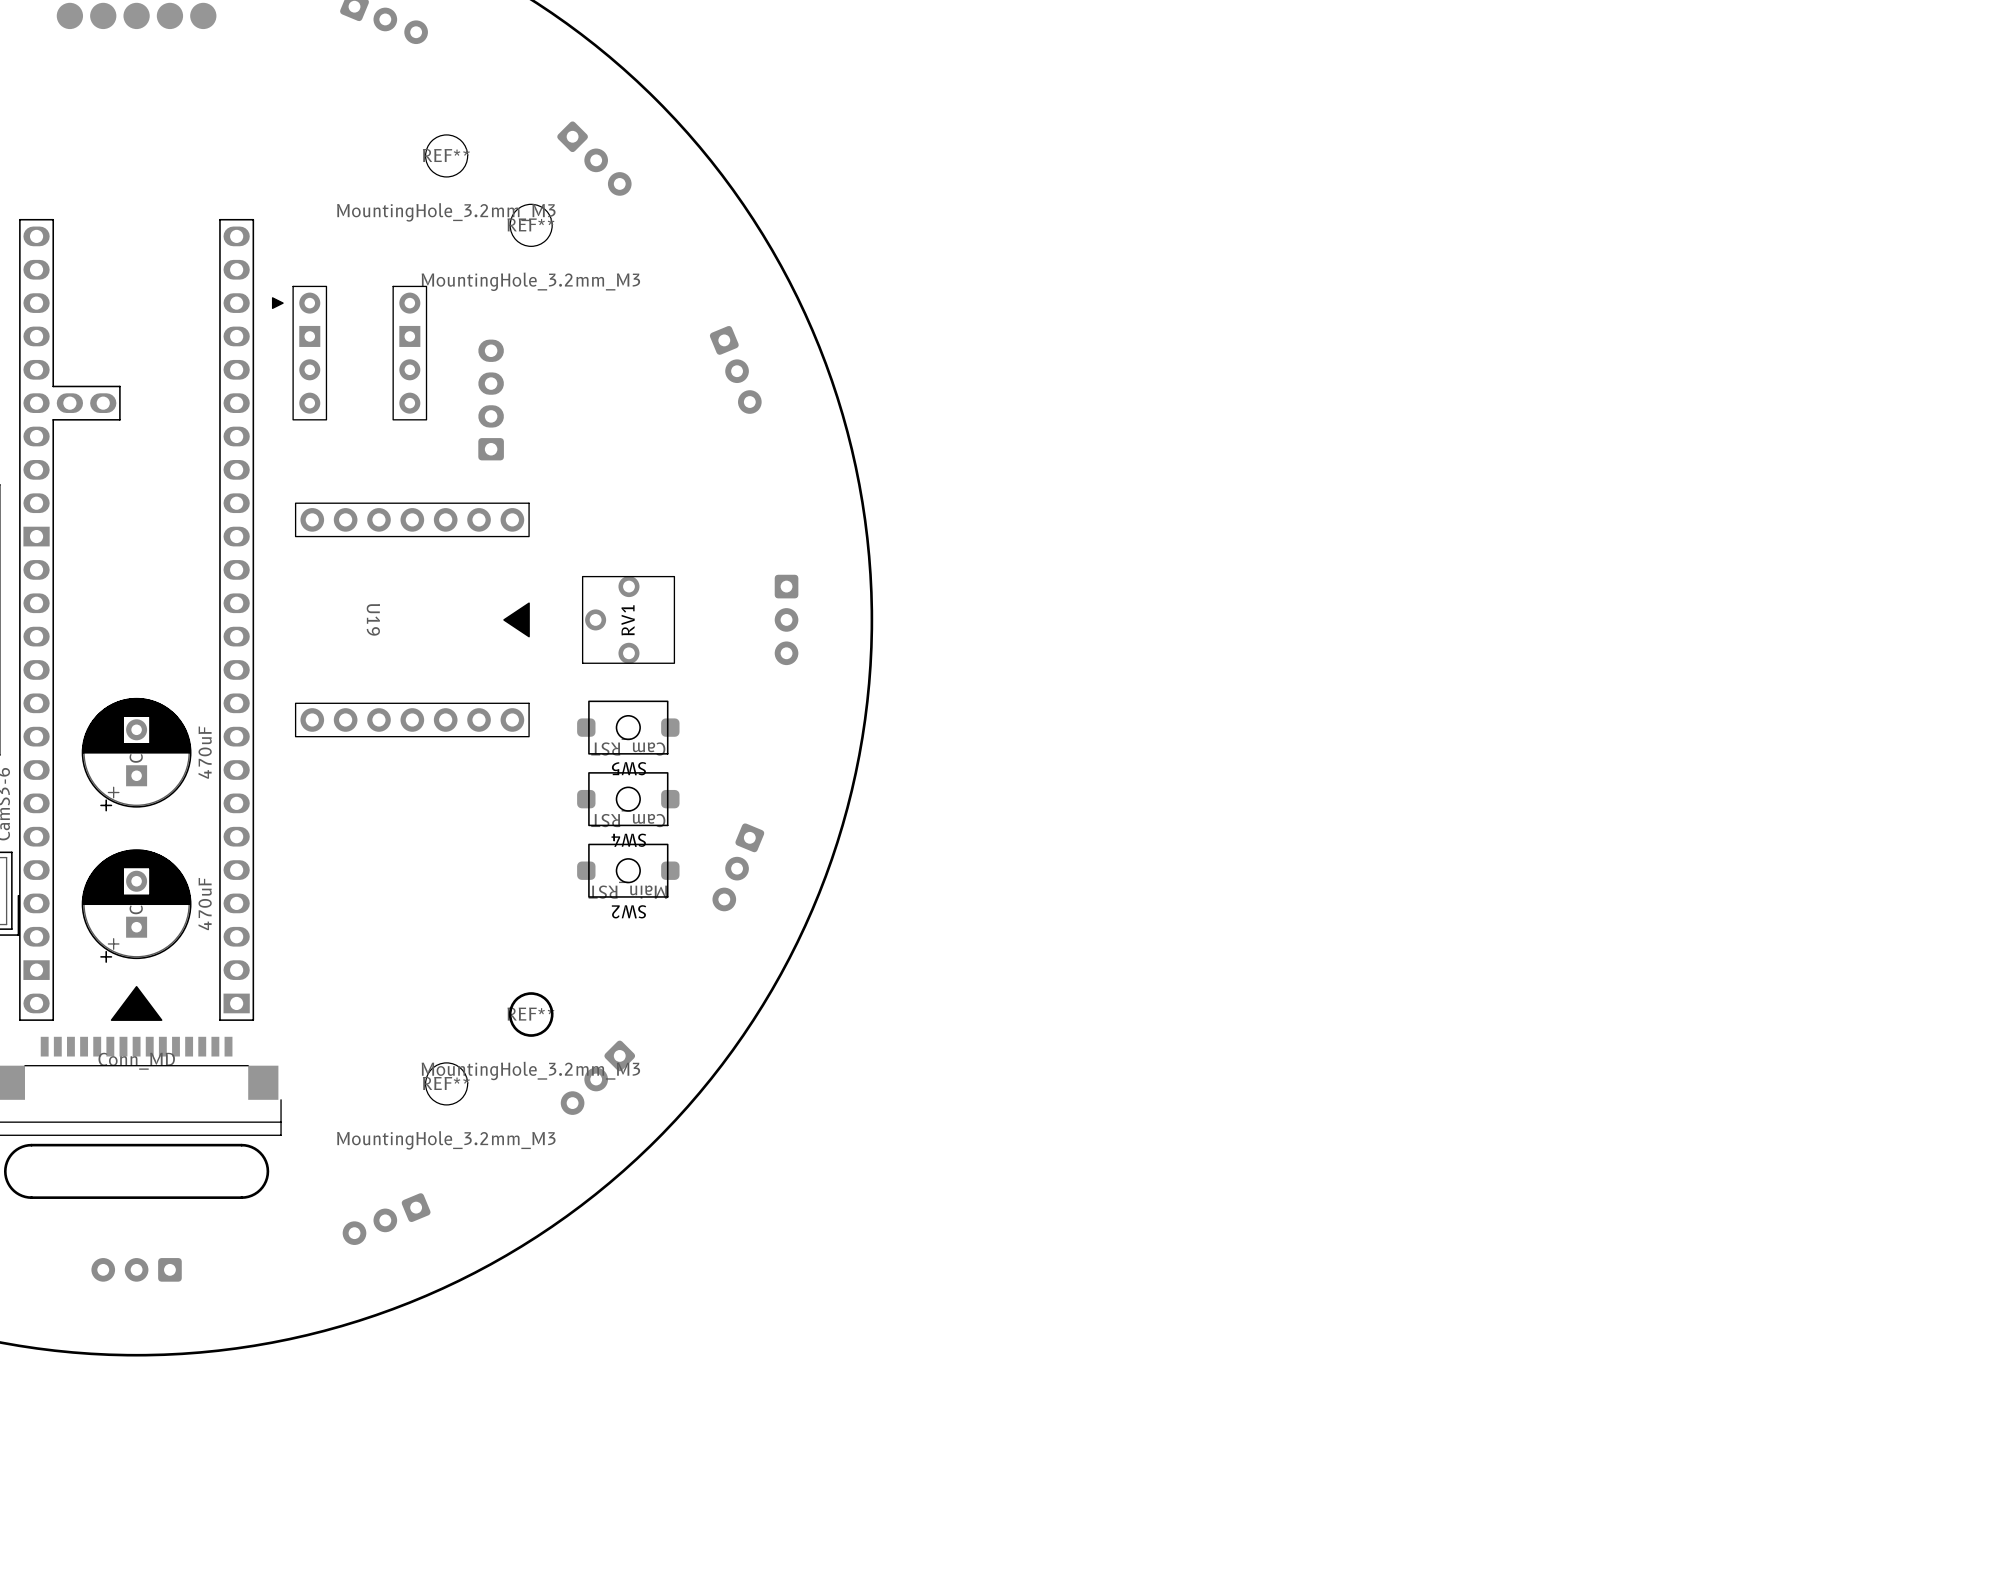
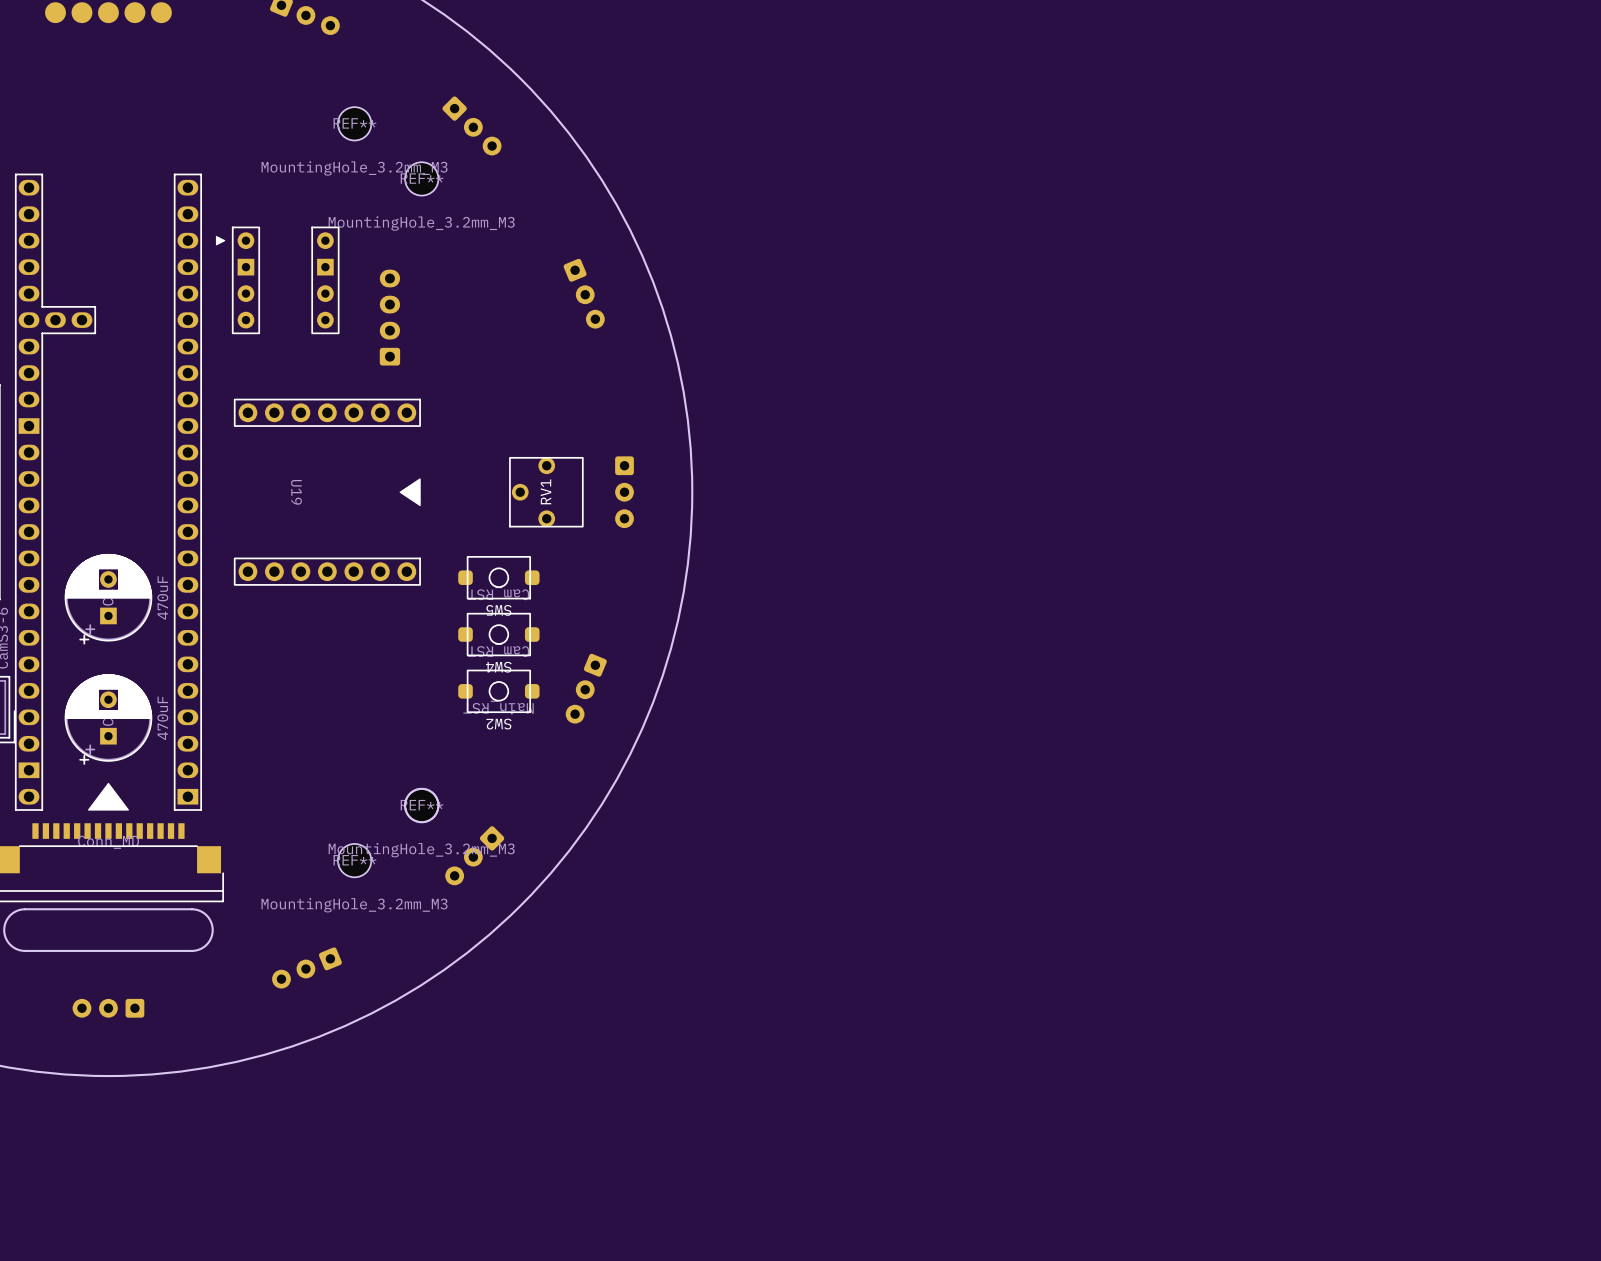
RV1 position: (628, 619) -> (546, 492)

